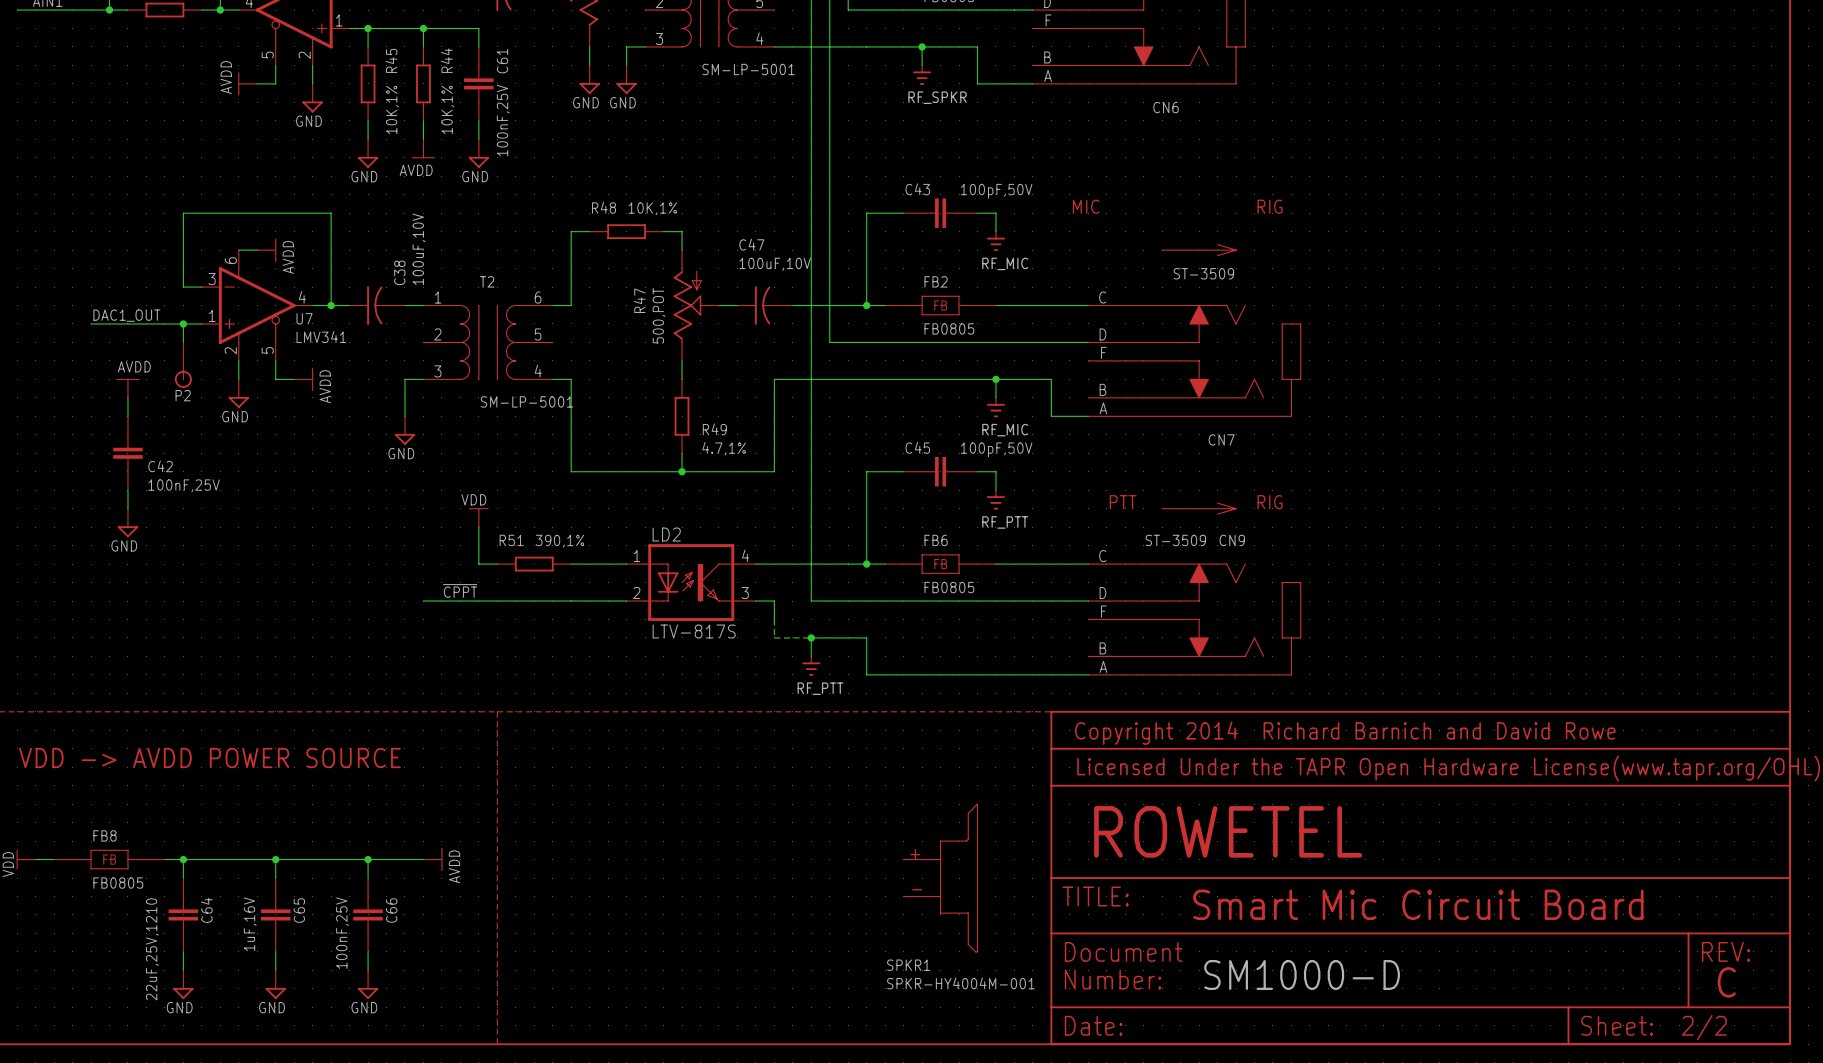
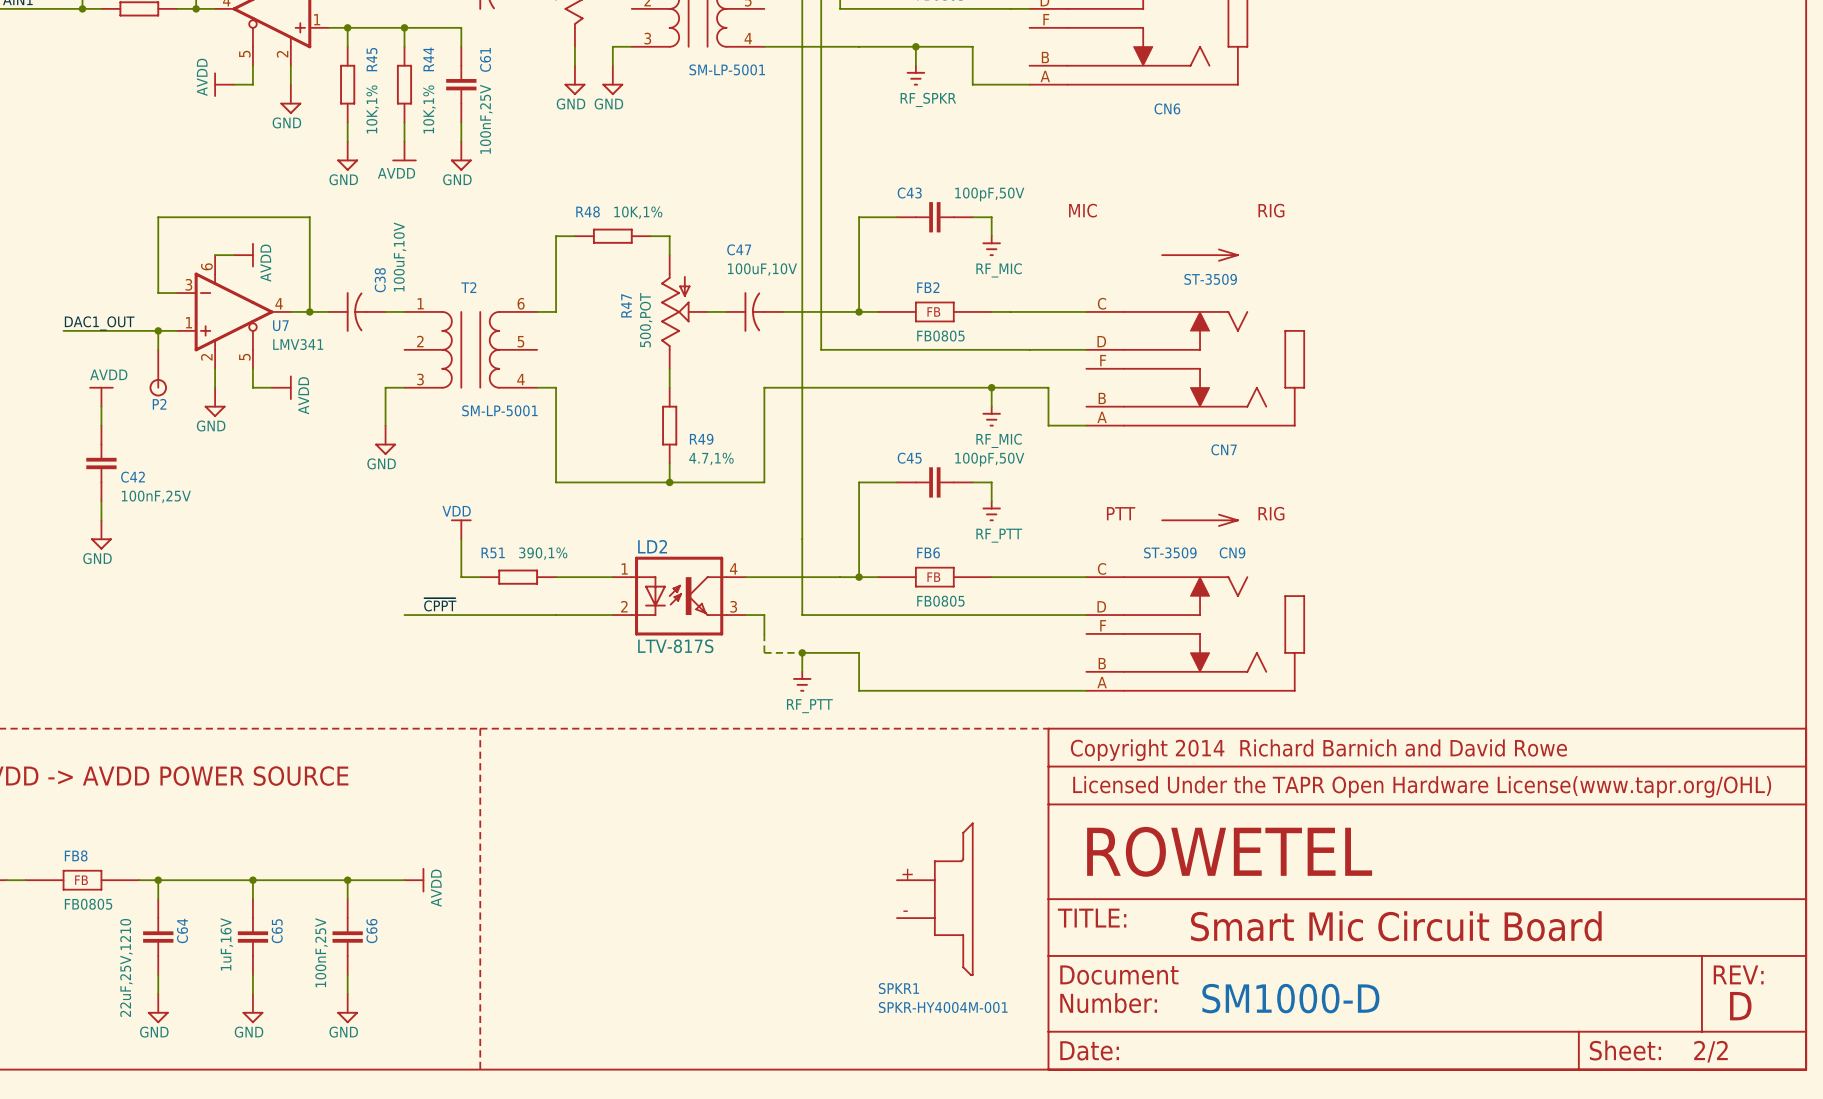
text: C (1726, 982) -> D (1740, 1006)

